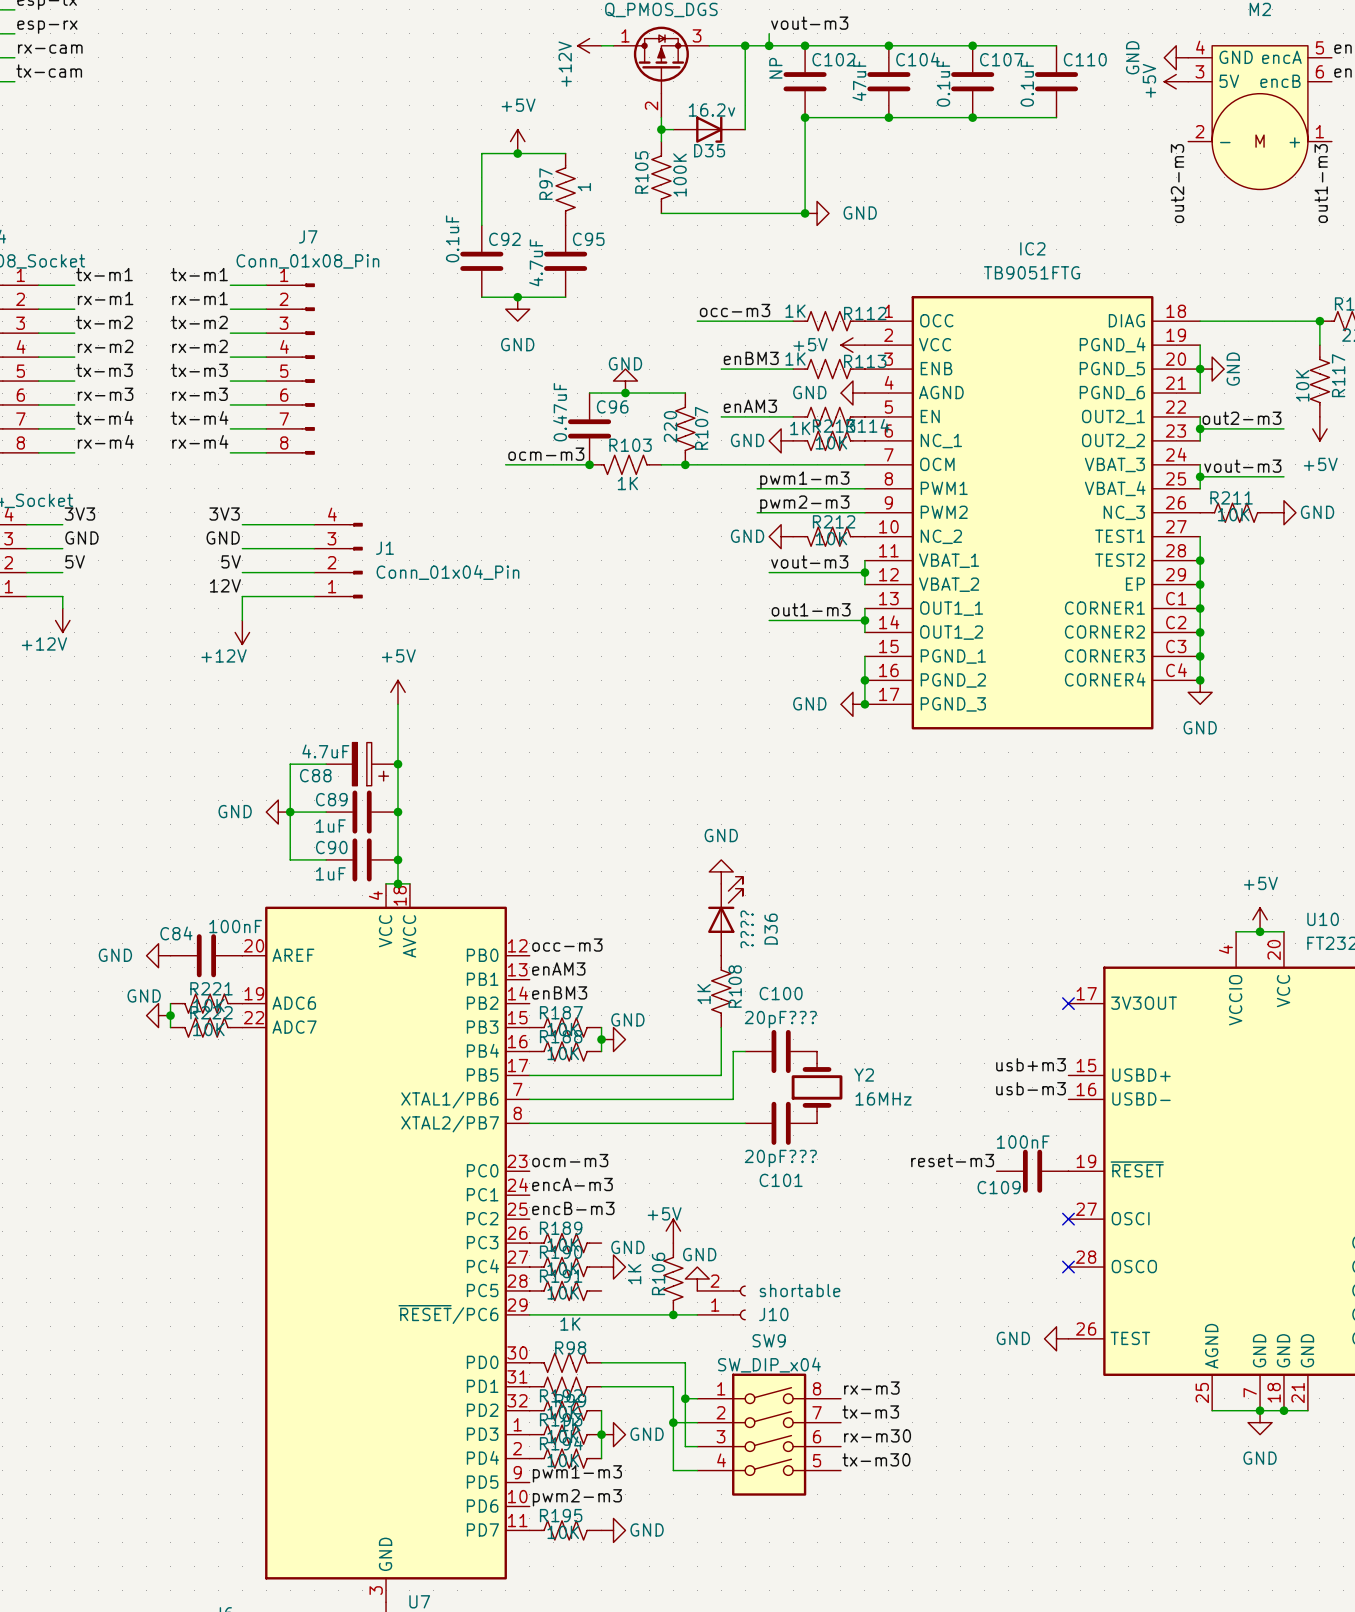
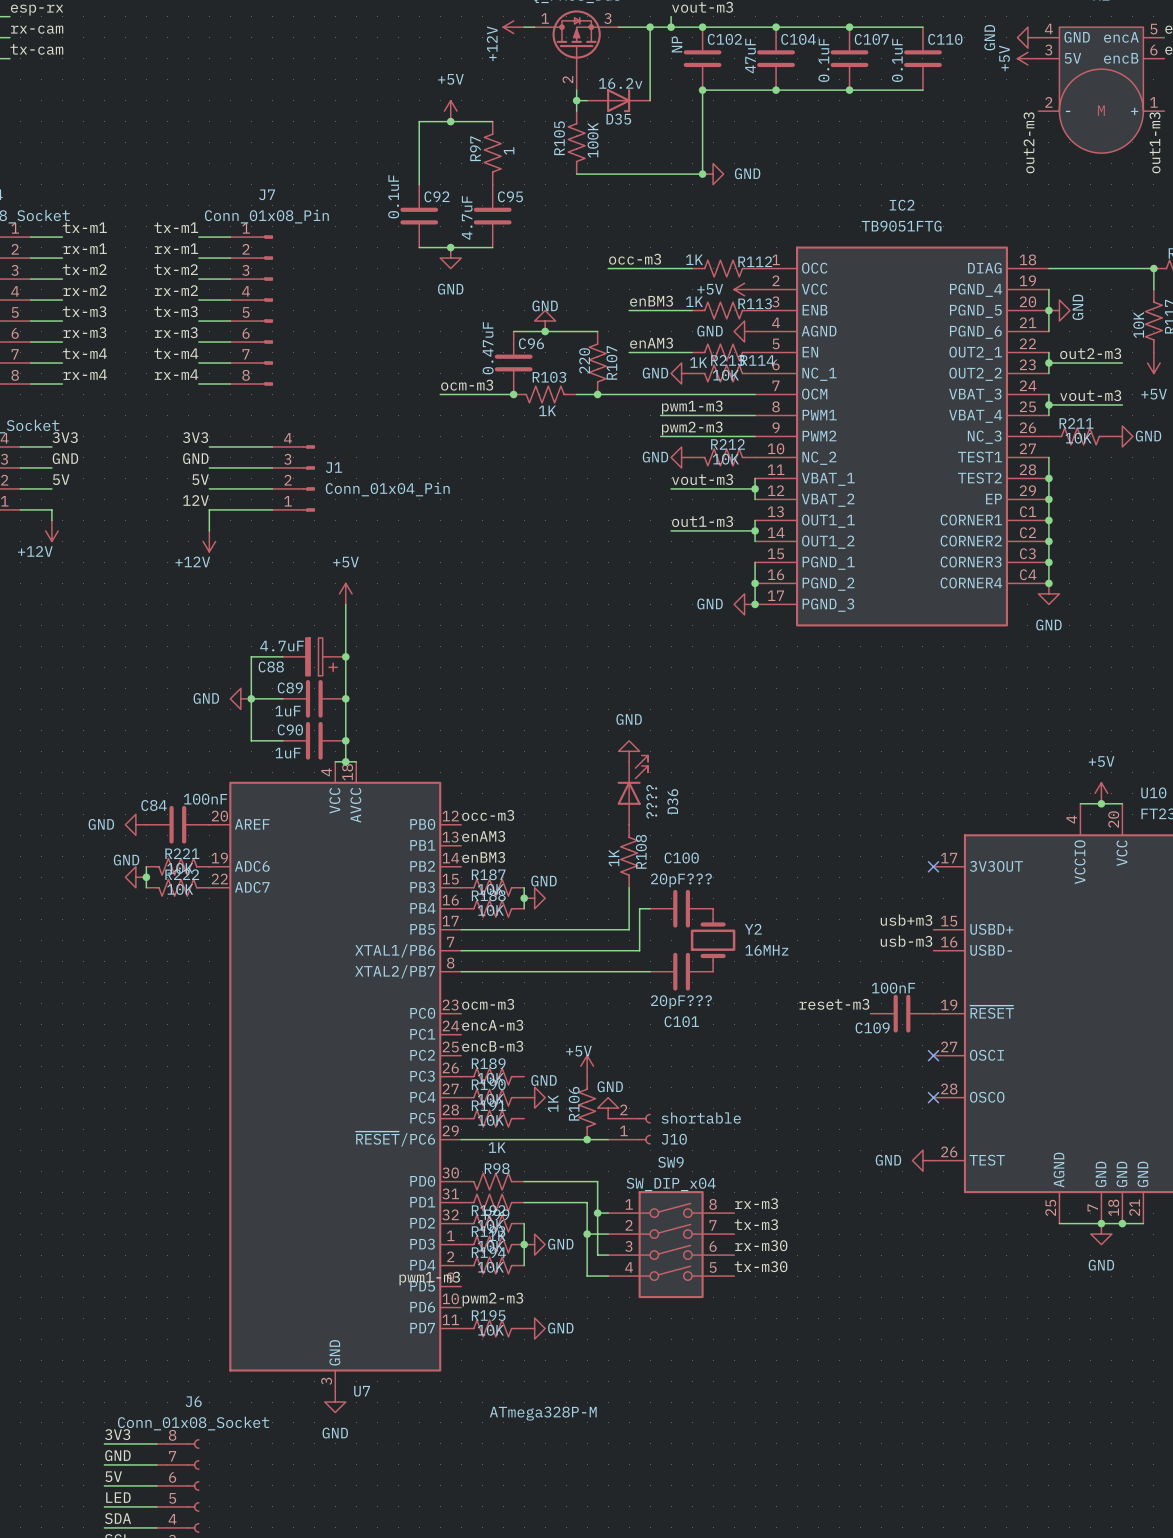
label position: pwm1-m3 (577, 1473) -> pwm1-m3 (429, 1278)

